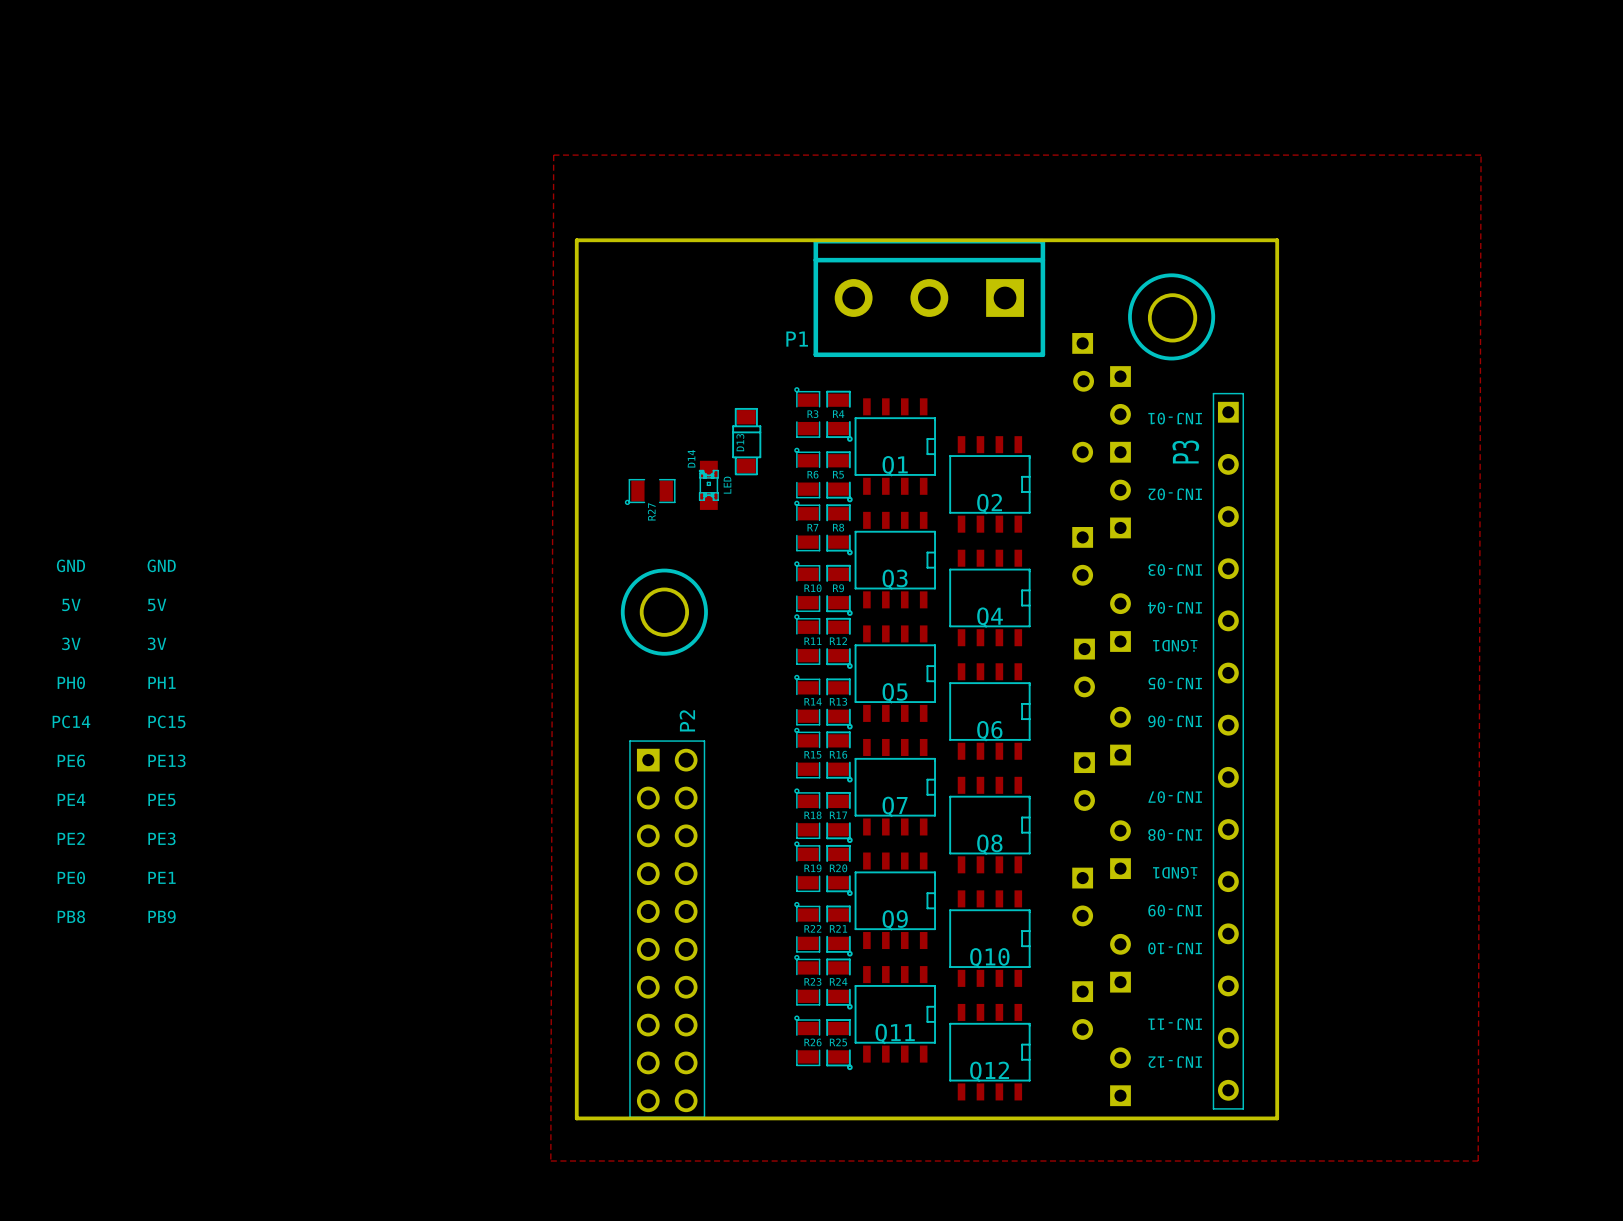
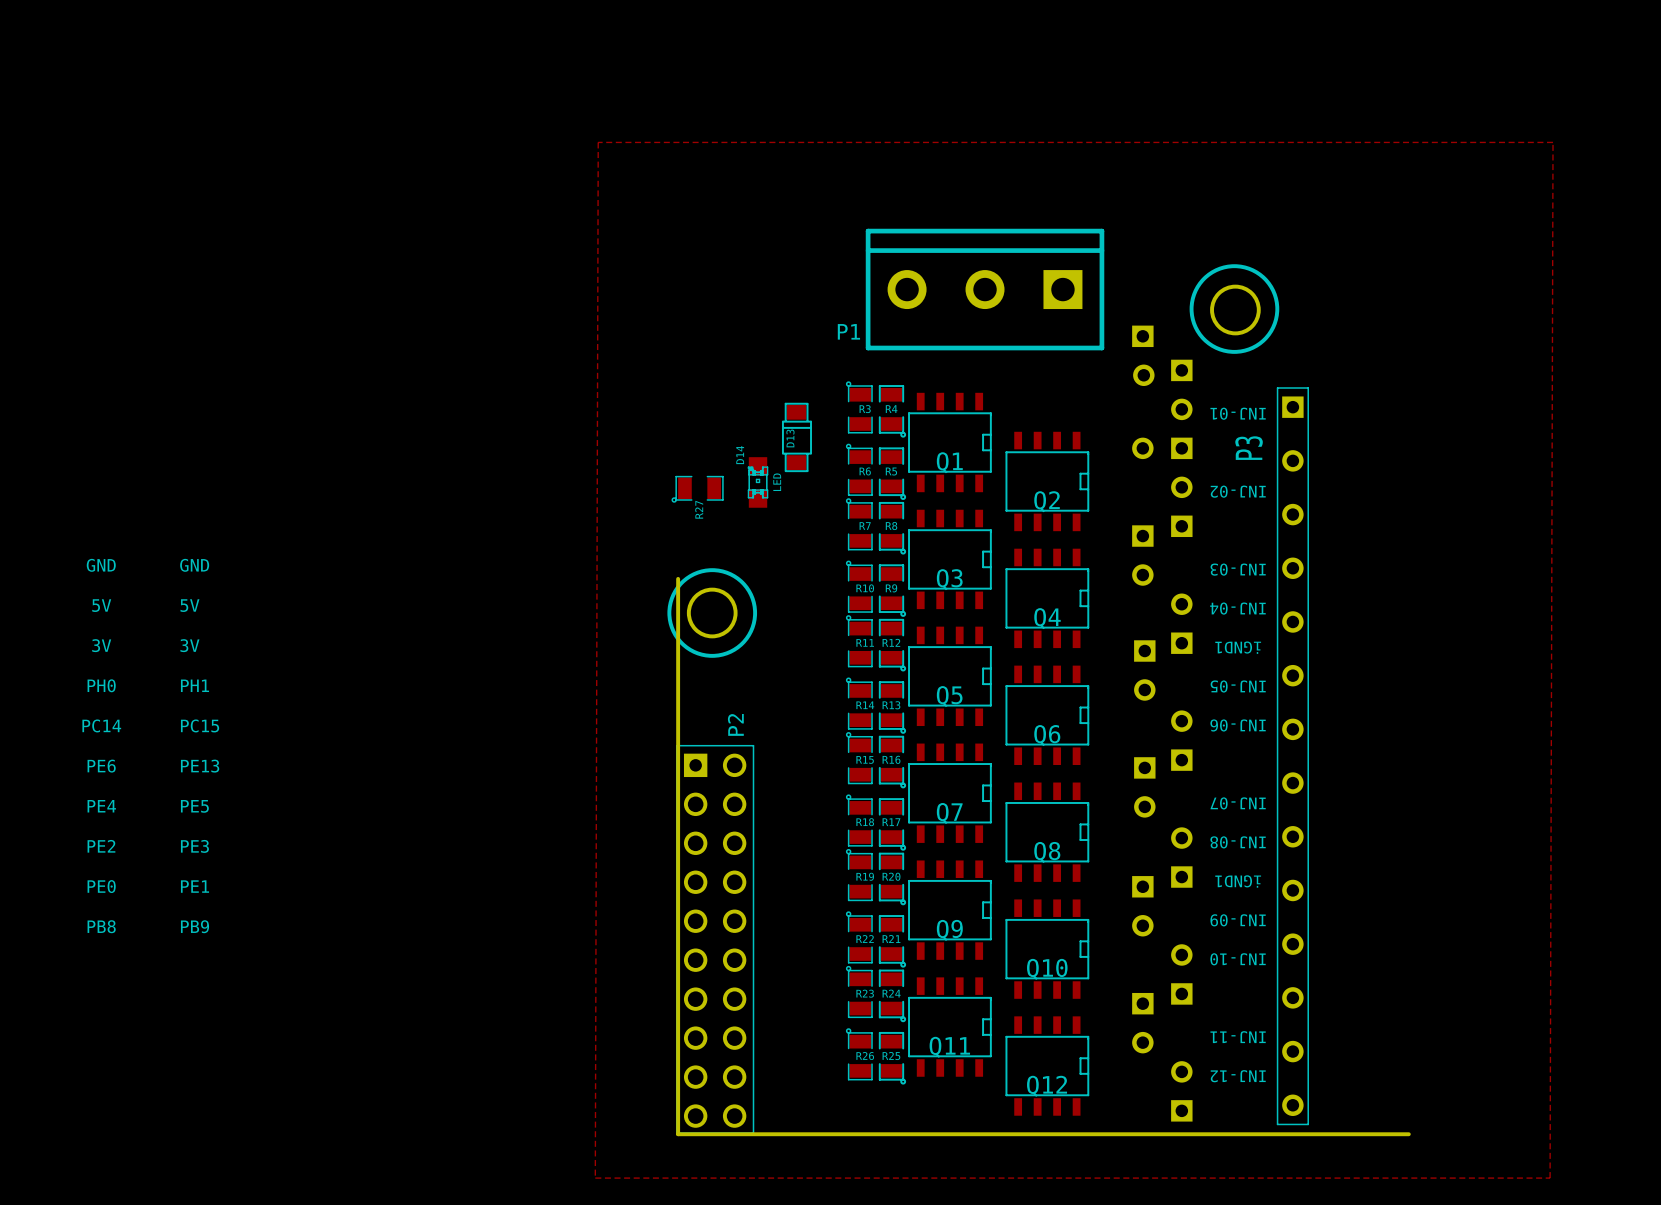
board edge: none -> (678, 578) (678, 1134)
board edge: (631, 1118) (576, 1118) (576, 240) (1277, 240) (1277, 1118) -> (1408, 1134) (1343, 1134)

